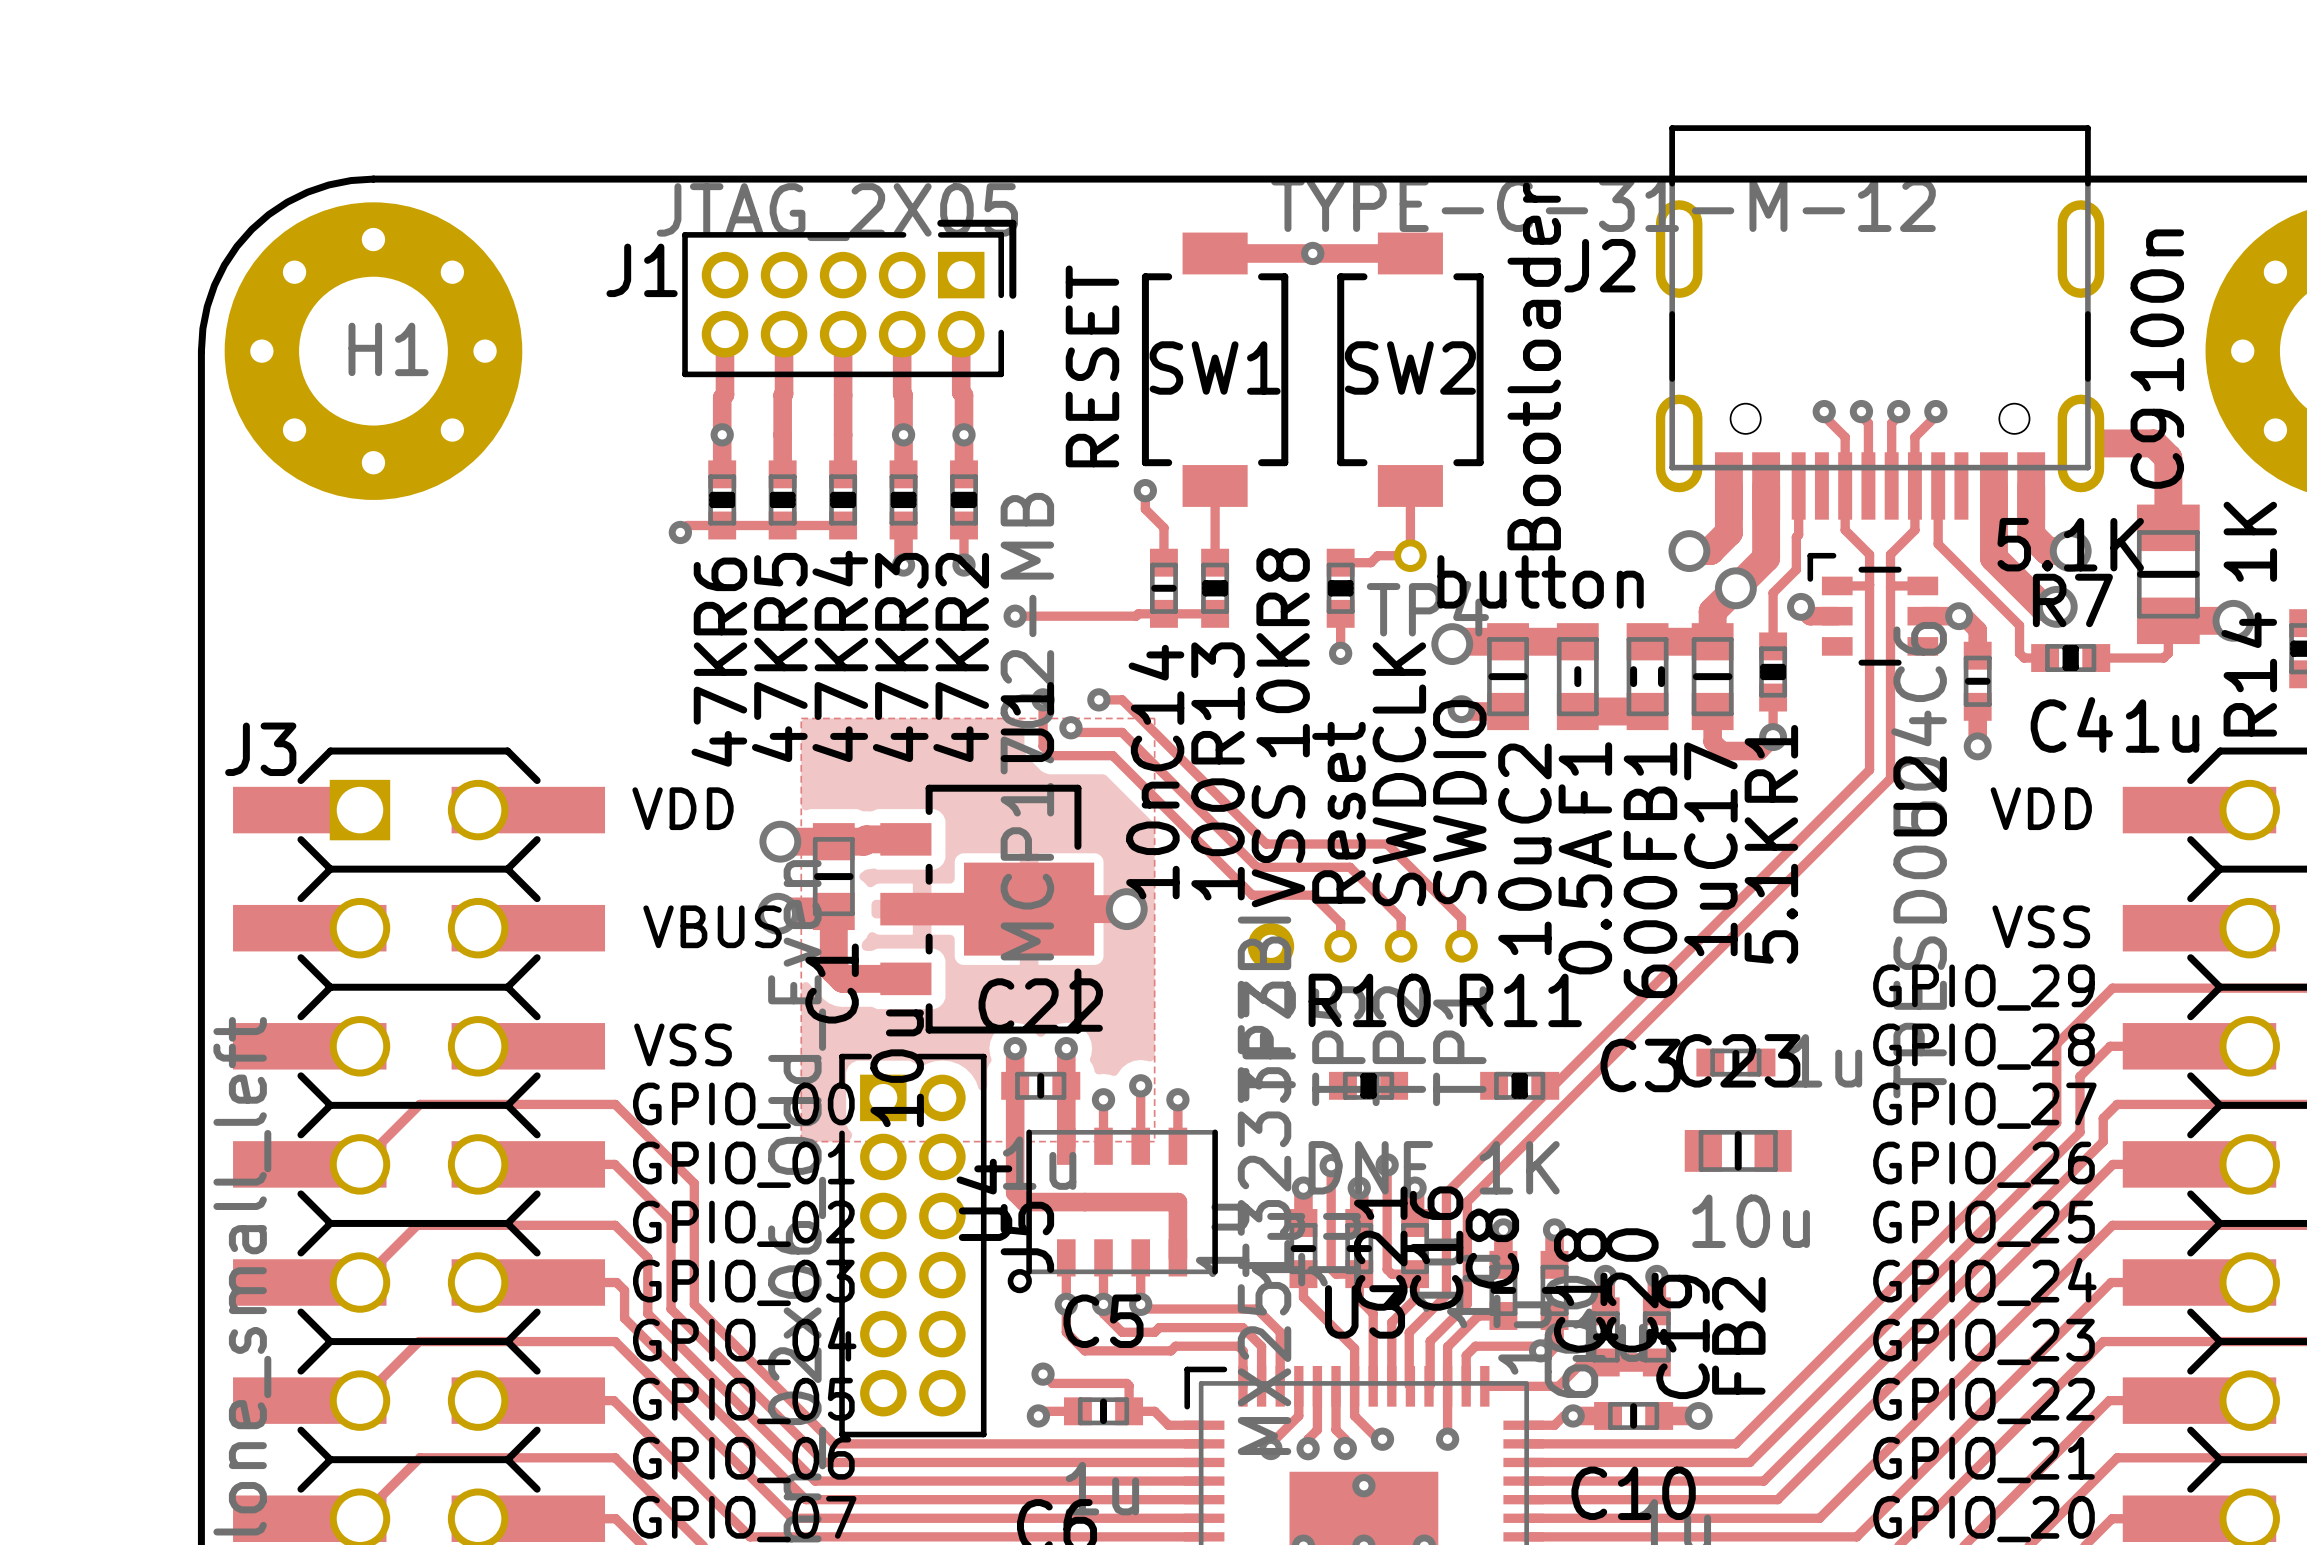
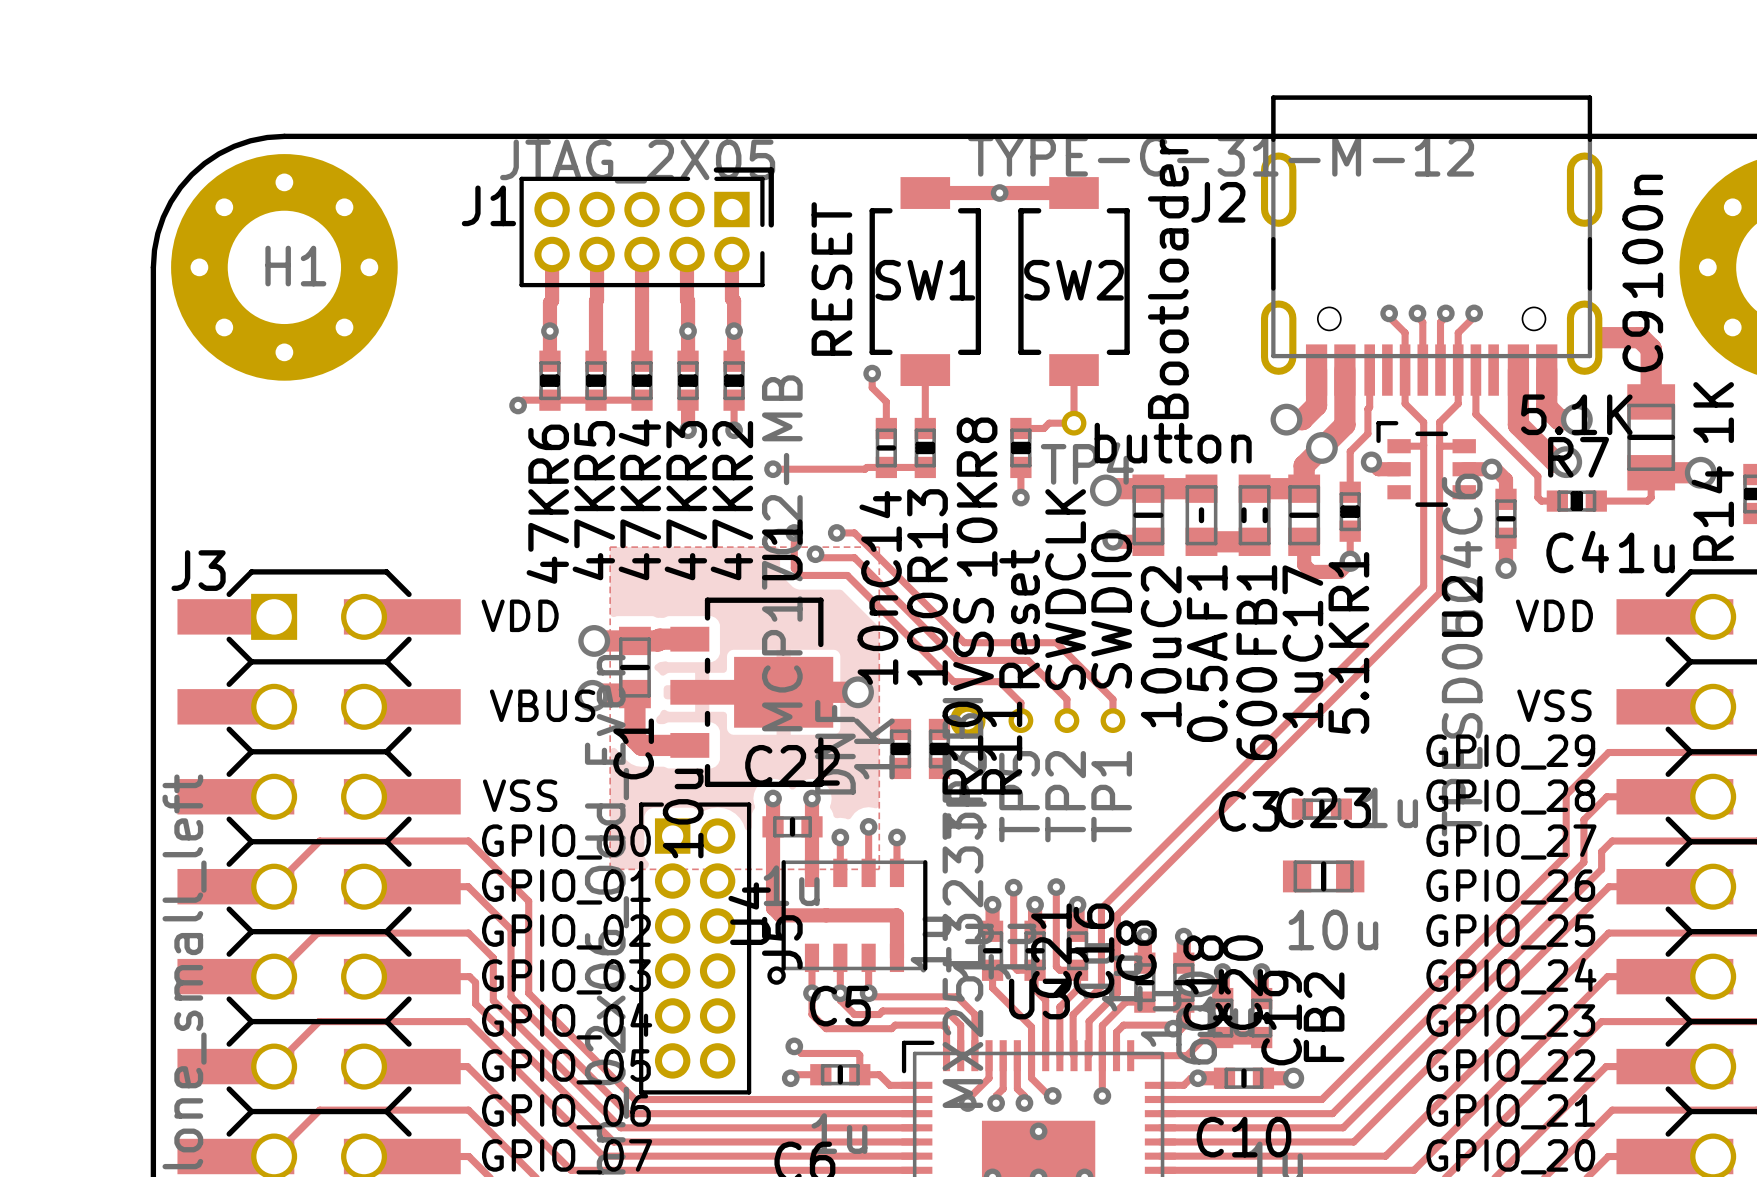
R10 rotation: 0° (1368, 1085) -> 90° clockwise (900, 748)
R10 position: (1368, 1085) -> (900, 748)
R11 rotation: 0° (1519, 1085) -> 90° clockwise (939, 748)
R11 position: (1519, 1085) -> (939, 748)

